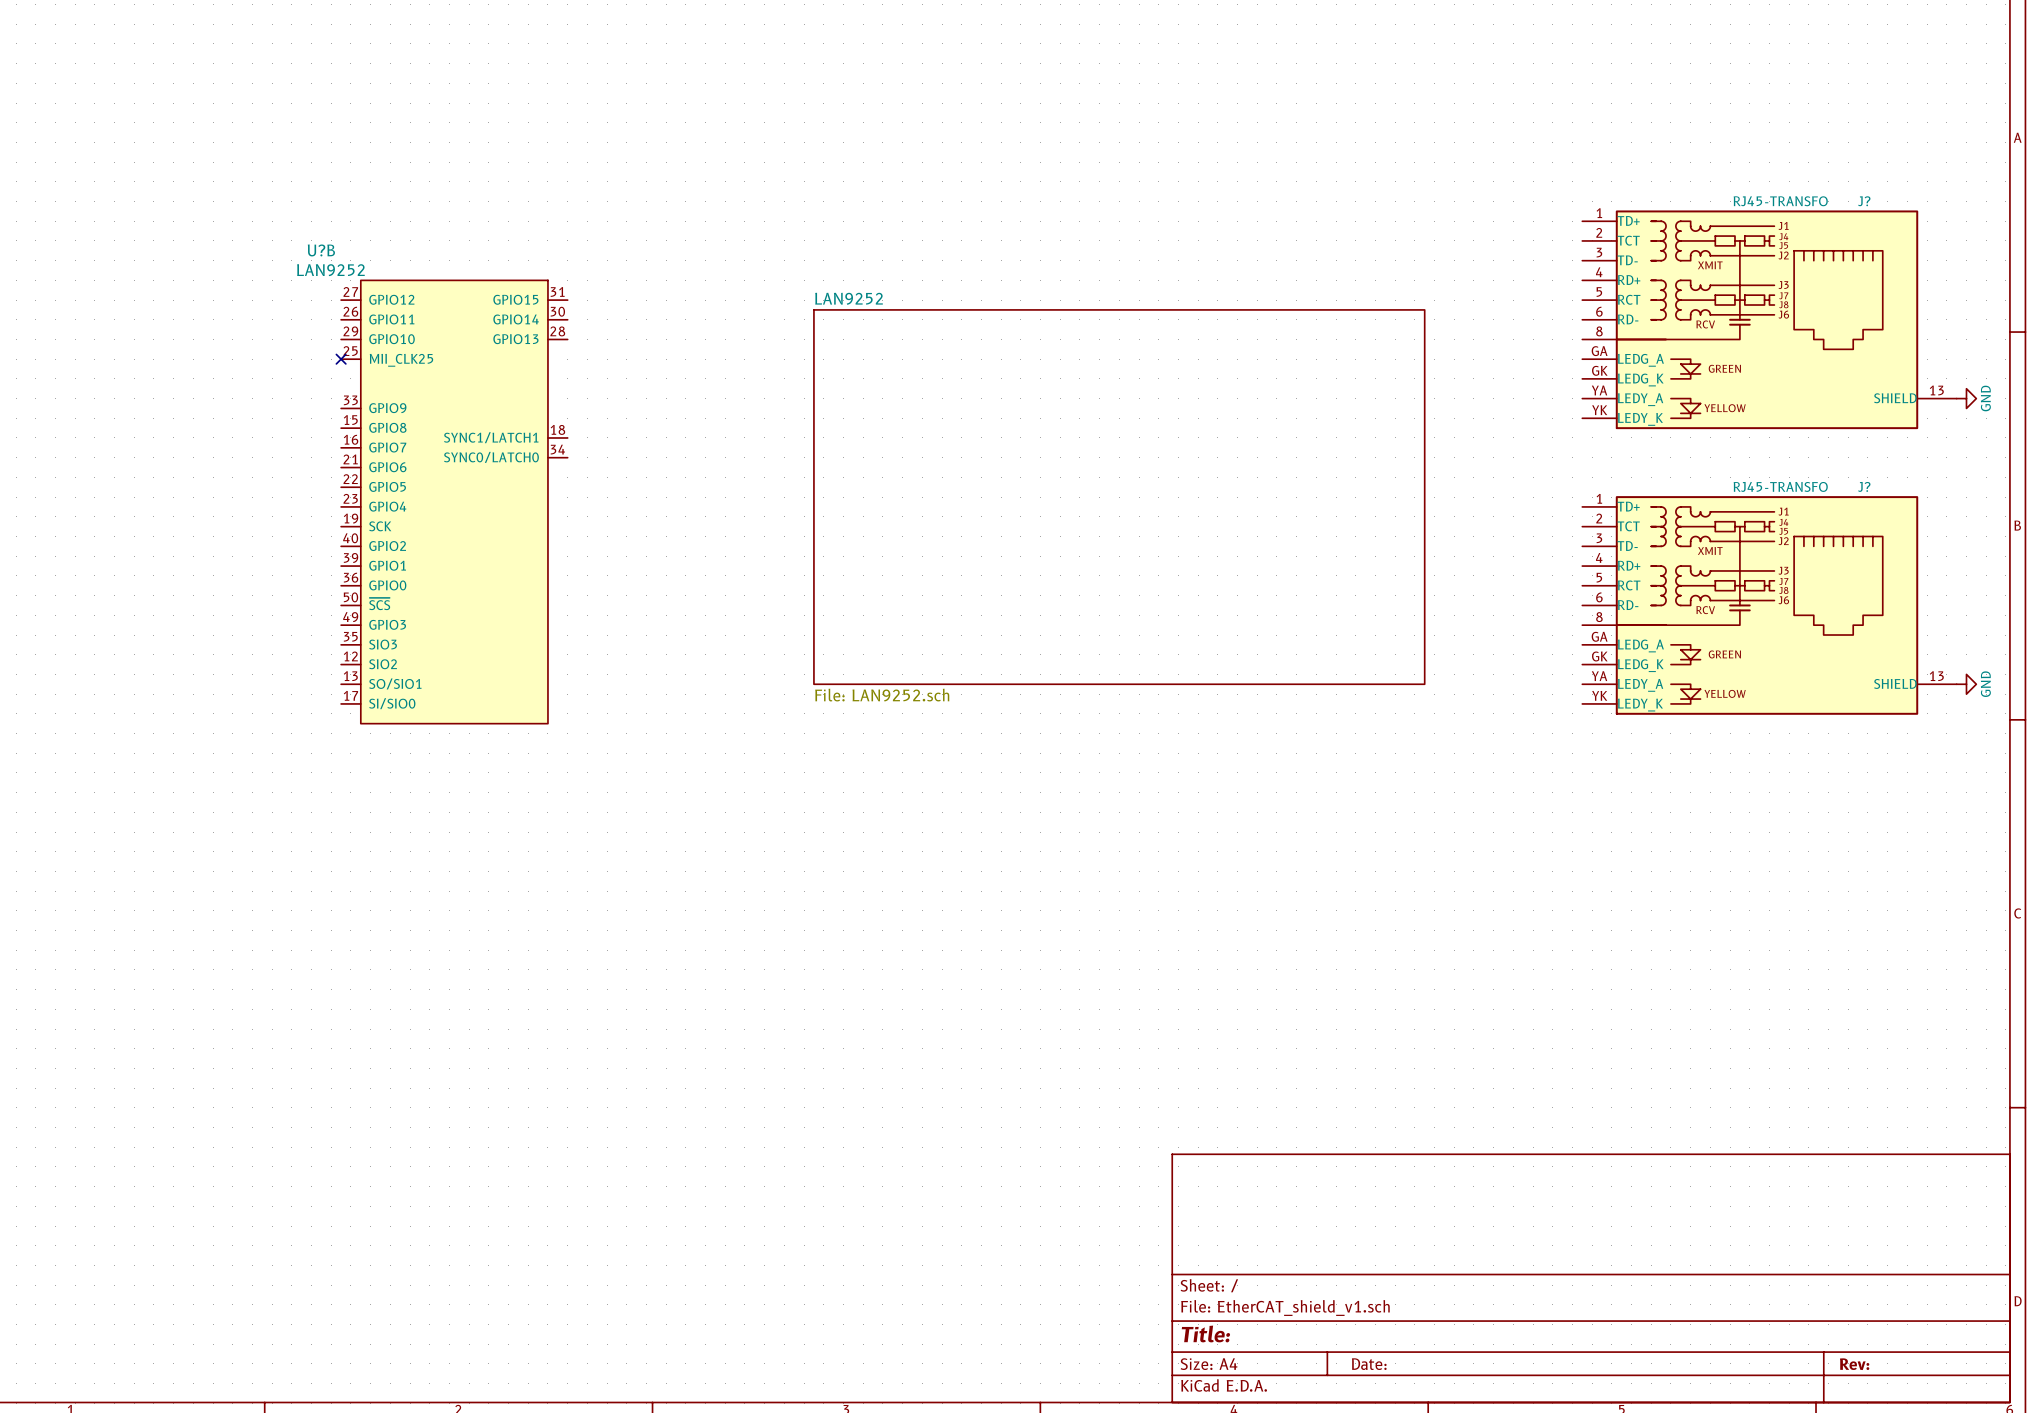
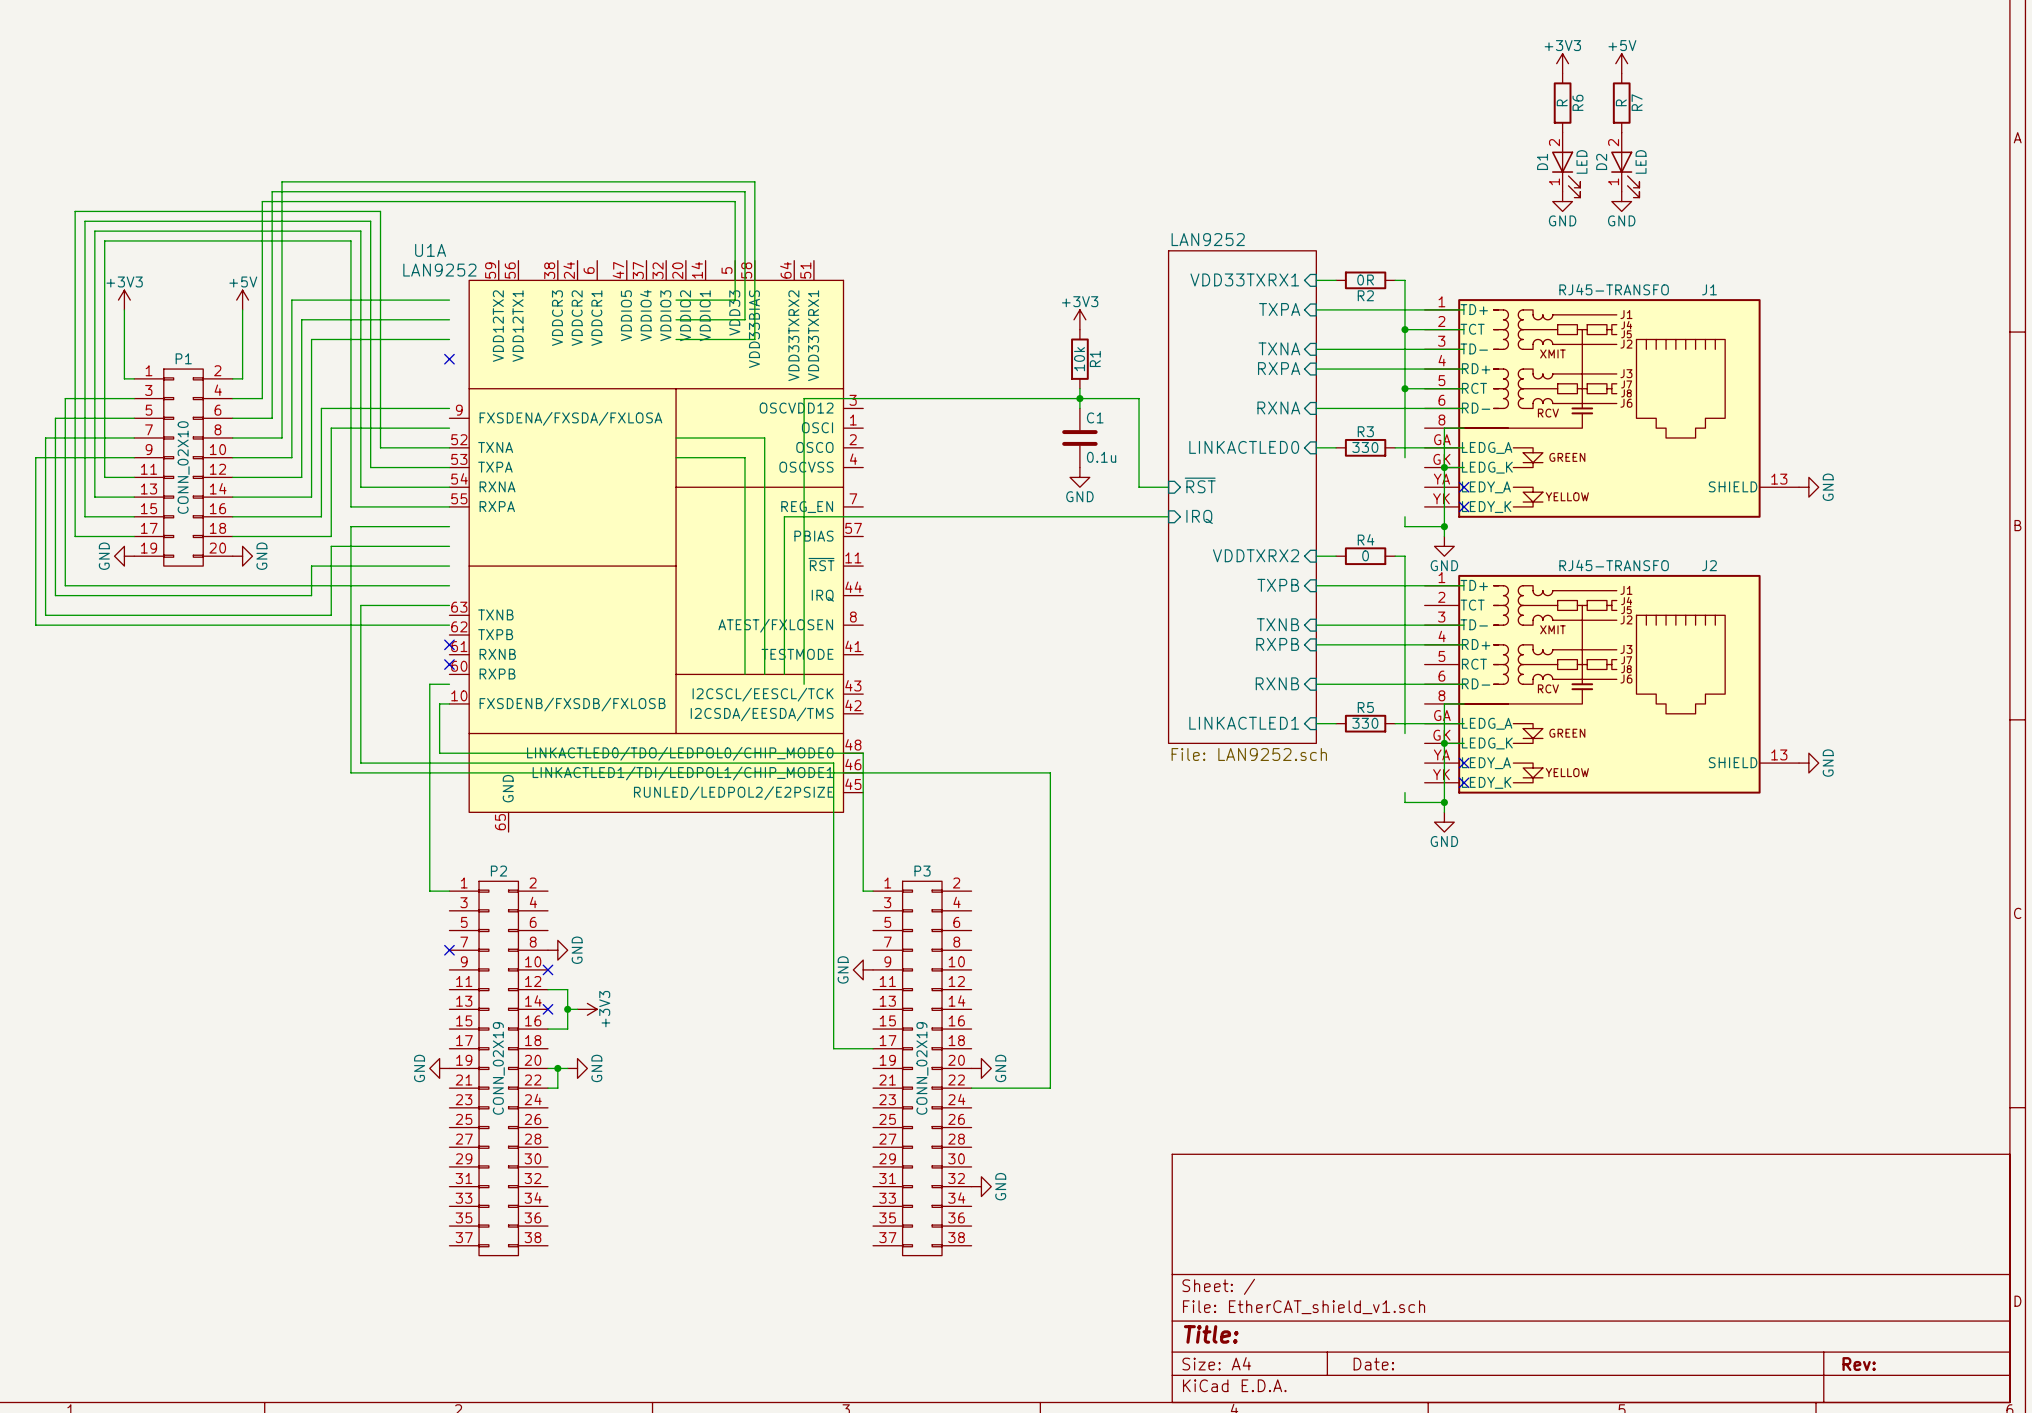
power symbol: none -> +3V3 (1562, 63)
power symbol: none -> +5V (1621, 63)
R6: none -> R (1562, 103)
R7: none -> R (1621, 103)
D1: none -> LED (1566, 165)
D2: none -> LED (1625, 165)
power symbol: none -> GND (1562, 201)
power symbol: none -> GND (1621, 201)
sheet pin: none -> VDD33TXRX1 (1244, 279)
wire: none -> (1316, 280) (1336, 280)
R2: none -> 0R (1365, 280)
wire: none -> (1395, 280) (1404, 280) (1404, 457)
sheet LAN9252 name position: LAN9252 (849, 298) -> LAN9252 (1208, 239)
power symbol: none -> +3V3 (124, 300)
power symbol: none -> +5V (242, 300)
wire: none -> (449, 300) (291, 300) (291, 457) (232, 457)
wire: none -> (676, 300) (735, 300) (735, 201) (262, 201) (262, 398) (232, 398)
wire: none -> (124, 309) (124, 378) (134, 378)
wire: none -> (242, 309) (242, 378) (232, 378)
sheet LAN9252 shape: [813, 309, 1425, 685] -> [1168, 250, 1317, 744]
sheet pin: none -> TXPA (1279, 309)
wire: none -> (449, 319) (301, 319) (301, 477) (232, 477)
wire: none -> (676, 319) (744, 319) (744, 191) (272, 191) (272, 418) (232, 418)
power symbol: none -> +3V3 (1079, 319)
J?: RJ45-TRANSFO (1769, 319) -> none
wire: none -> (1404, 329) (1464, 329)
junction: none -> (1404, 329)
wire: none -> (449, 339) (311, 339) (311, 497) (232, 497)
wire: none -> (676, 339) (754, 339) (754, 181) (282, 181) (282, 437) (232, 437)
sheet pin: none -> TXNA (1279, 348)
wire: none -> (1316, 349) (1464, 349)
no-connect mark: (341, 359) -> none
no-connect mark: none -> (449, 359)
R1: none -> 10k (1079, 359)
sheet pin: none -> RXPA (1279, 368)
wire: none -> (1316, 369) (1464, 369)
wire: none -> (1079, 388) (1079, 408)
wire: none -> (1404, 388) (1464, 388)
junction: none -> (1404, 388)
wire: none -> (134, 398) (65, 398) (65, 585) (449, 585)
junction: none -> (1079, 398)
power symbol: GND (1966, 398) -> none
wire: none -> (449, 408) (321, 408) (321, 516) (232, 516)
sheet pin: none -> RXNA (1278, 408)
wire: none -> (1316, 408) (1464, 408)
J1: none -> RJ45-TRANSFO (1611, 408)
wire: none -> (134, 418) (55, 418) (55, 595) (311, 595) (311, 566) (449, 566)
wire: none -> (449, 428) (331, 428) (331, 536) (232, 536)
wire: none -> (1464, 428) (1444, 428) (1444, 536)
wire: none -> (134, 437) (45, 437) (45, 615) (331, 615) (331, 546) (449, 546)
wire: none -> (676, 437) (764, 437) (764, 674)
C1: none -> 0.1u (1079, 437)
wire: none -> (449, 447) (380, 447) (380, 211) (75, 211) (75, 536) (134, 536)
sheet pin: none -> LINKACTLED0 (1244, 447)
wire: none -> (1316, 447) (1336, 447)
R3: none -> 330 (1365, 447)
wire: none -> (1395, 447) (1464, 447)
wire: none -> (134, 457) (35, 457) (35, 625) (449, 625)
wire: none -> (676, 457) (744, 457) (744, 674)
P1: none -> CONN_02X10 (183, 467)
wire: none -> (449, 467) (370, 467) (370, 221) (84, 221) (84, 516) (134, 516)
wire: none -> (1444, 467) (1464, 467)
junction: none -> (1444, 467)
wire: none -> (134, 477) (104, 477) (104, 240) (350, 240) (350, 506) (449, 506)
power symbol: none -> GND (1079, 477)
sheet pin: none -> ~{RST} (1200, 485)
wire: none -> (449, 487) (360, 487) (360, 231) (94, 231) (94, 497) (134, 497)
wire: none -> (1168, 487) (1139, 487) (1139, 398) (804, 398) (804, 684)
no-connect mark: none -> (1464, 487)
power symbol: none -> GND (1808, 487)
U?B: LAN9252 (454, 502) -> none
no-connect mark: none -> (1464, 506)
wire: none -> (1168, 516) (784, 516) (784, 674)
sheet pin: none -> IRQ (1199, 516)
wire: none -> (1404, 516) (1404, 526) (1444, 526)
wire: none -> (449, 526) (350, 526) (350, 772) (1050, 772) (1050, 1088) (971, 1088)
junction: none -> (1444, 526)
U1A: none -> LAN9252 (656, 546)
power symbol: none -> GND (1444, 546)
sheet pin: none -> VDDTXRX2 (1256, 555)
power symbol: none -> GND (124, 556)
power symbol: none -> GND (242, 556)
wire: none -> (1316, 556) (1336, 556)
R4: none -> 0 (1365, 556)
wire: none -> (1395, 556) (1404, 556) (1404, 733)
sheet pin: none -> TXPB (1278, 585)
wire: none -> (1316, 585) (1464, 585)
wire: none -> (449, 605) (360, 605) (360, 763) (833, 763) (833, 1048) (873, 1048)
J?: RJ45-TRANSFO (1769, 605) -> none
sheet pin: none -> TXNB (1277, 624)
wire: none -> (1316, 625) (1464, 625)
no-connect mark: none -> (449, 644)
sheet pin: none -> RXPB (1277, 644)
wire: none -> (1316, 644) (1464, 644)
no-connect mark: none -> (449, 664)
sheet pin: none -> RXNB (1277, 683)
wire: none -> (449, 684) (429, 684) (429, 891) (449, 891)
J2: none -> RJ45-TRANSFO (1611, 684)
power symbol: GND (1966, 684) -> none
sheet LAN9252 value position: File: LAN9252.sch (882, 695) -> File: LAN9252.sch (1249, 754)
wire: none -> (449, 703) (439, 703) (439, 753) (863, 753) (863, 891) (873, 891)
wire: none -> (1464, 703) (1444, 703) (1444, 812)
sheet pin: none -> LINKACTLED1 (1244, 723)
wire: none -> (1316, 723) (1336, 723)
R5: none -> 330 (1365, 723)
wire: none -> (1395, 723) (1464, 723)
wire: none -> (1444, 743) (1464, 743)
junction: none -> (1444, 743)
no-connect mark: none -> (1464, 763)
power symbol: none -> GND (1808, 763)
no-connect mark: none -> (1464, 782)
wire: none -> (1404, 792) (1404, 802) (1444, 802)
junction: none -> (1444, 802)
power symbol: none -> GND (1444, 822)
no-connect mark: none -> (449, 950)
power symbol: none -> GND (557, 950)
no-connect mark: none -> (547, 969)
power symbol: none -> GND (863, 969)
wire: none -> (547, 989) (567, 989) (567, 1029) (547, 1029)
no-connect mark: none -> (547, 1009)
wire: none -> (567, 1009) (577, 1009)
junction: none -> (567, 1009)
power symbol: none -> +3V3 (587, 1009)
power symbol: none -> GND (439, 1068)
P2: none -> CONN_02X19 (498, 1068)
wire: none -> (547, 1068) (567, 1068)
wire: none -> (557, 1068) (557, 1088) (547, 1088)
junction: none -> (557, 1068)
power symbol: none -> GND (577, 1068)
P3: none -> CONN_02X19 (922, 1068)
power symbol: none -> GND (981, 1068)
power symbol: none -> GND (981, 1186)

